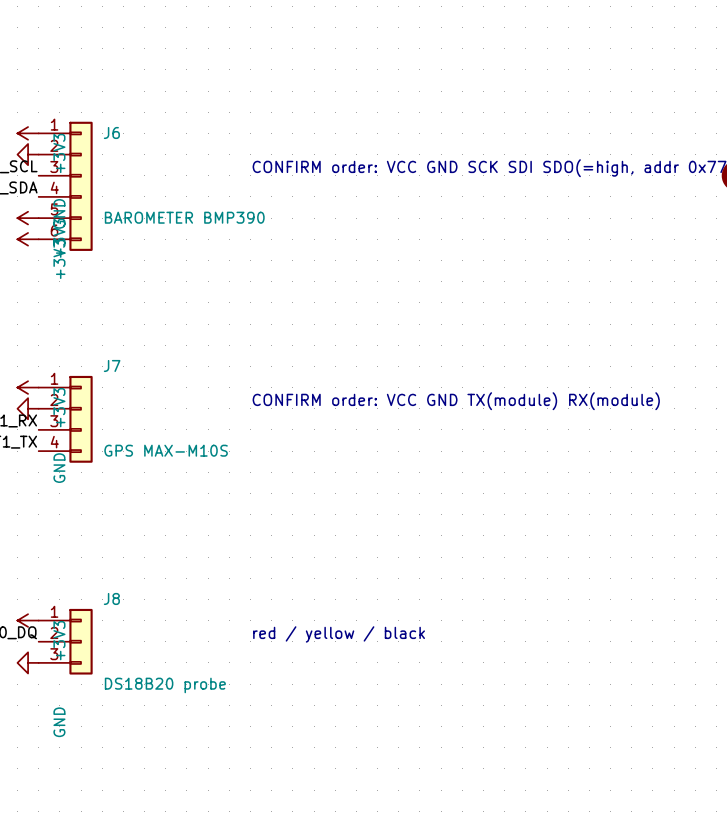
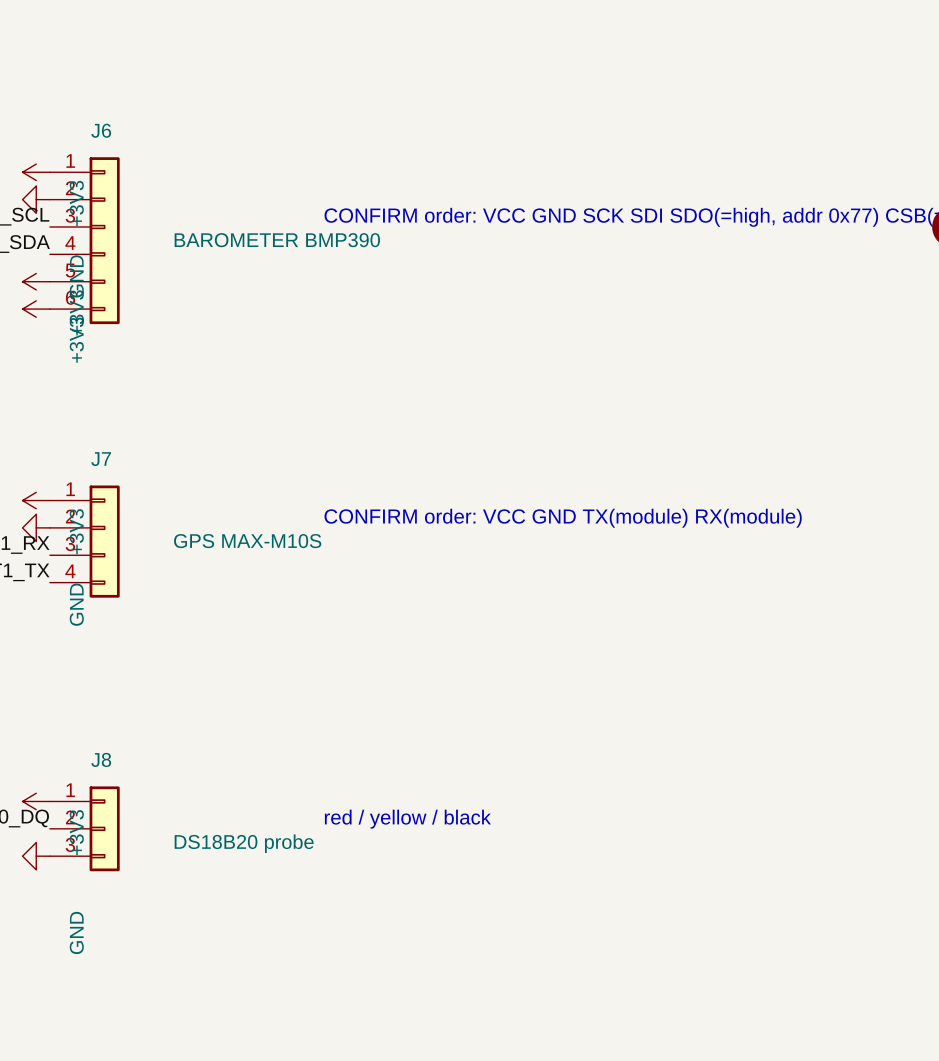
J6 name position: J6 (111, 132) -> J6 (101, 130)
J6 value position: BAROMETER BMP390 (184, 217) -> BAROMETER BMP390 (277, 240)
J7 name position: J7 (112, 365) -> J7 (101, 459)
J7 value position: GPS MAX-M10S (166, 450) -> GPS MAX-M10S (247, 541)
J8 name position: J8 (111, 598) -> J8 (101, 759)
J8 value position: DS18B20 probe (165, 685) -> DS18B20 probe (244, 843)

